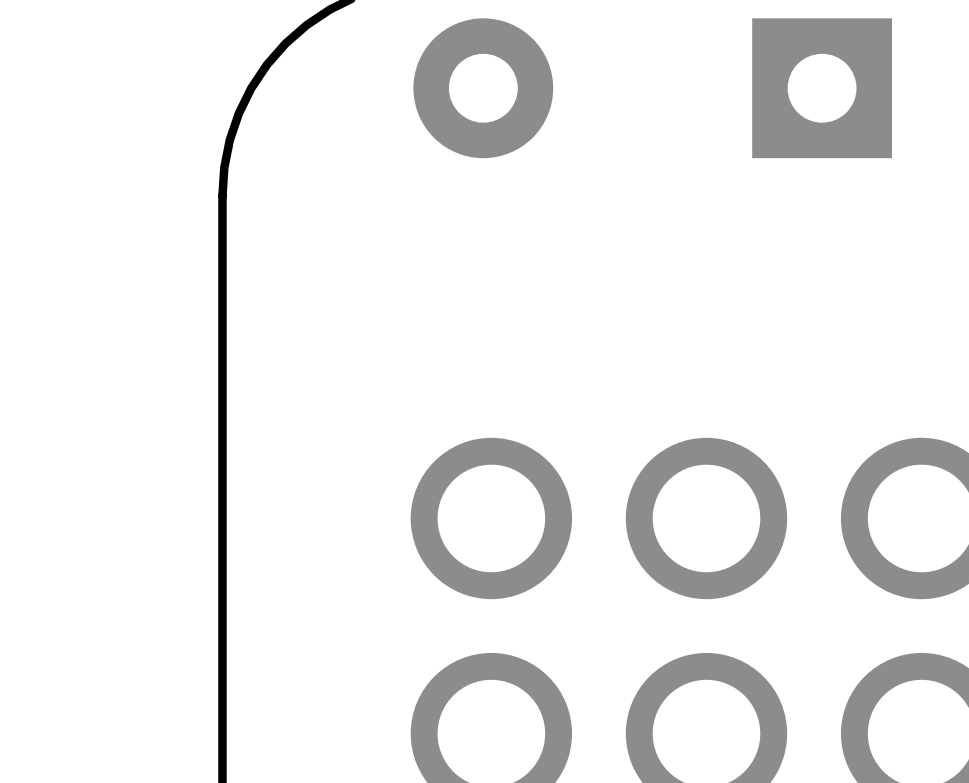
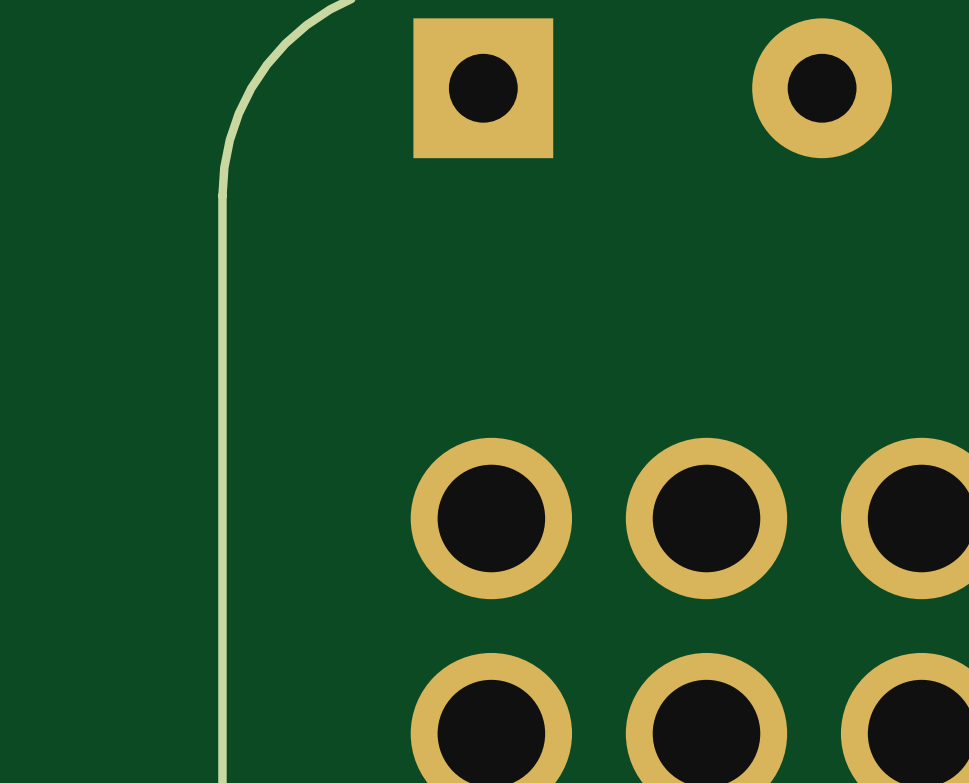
part rotation: 0° (652, 88) -> 180° (652, 88)

